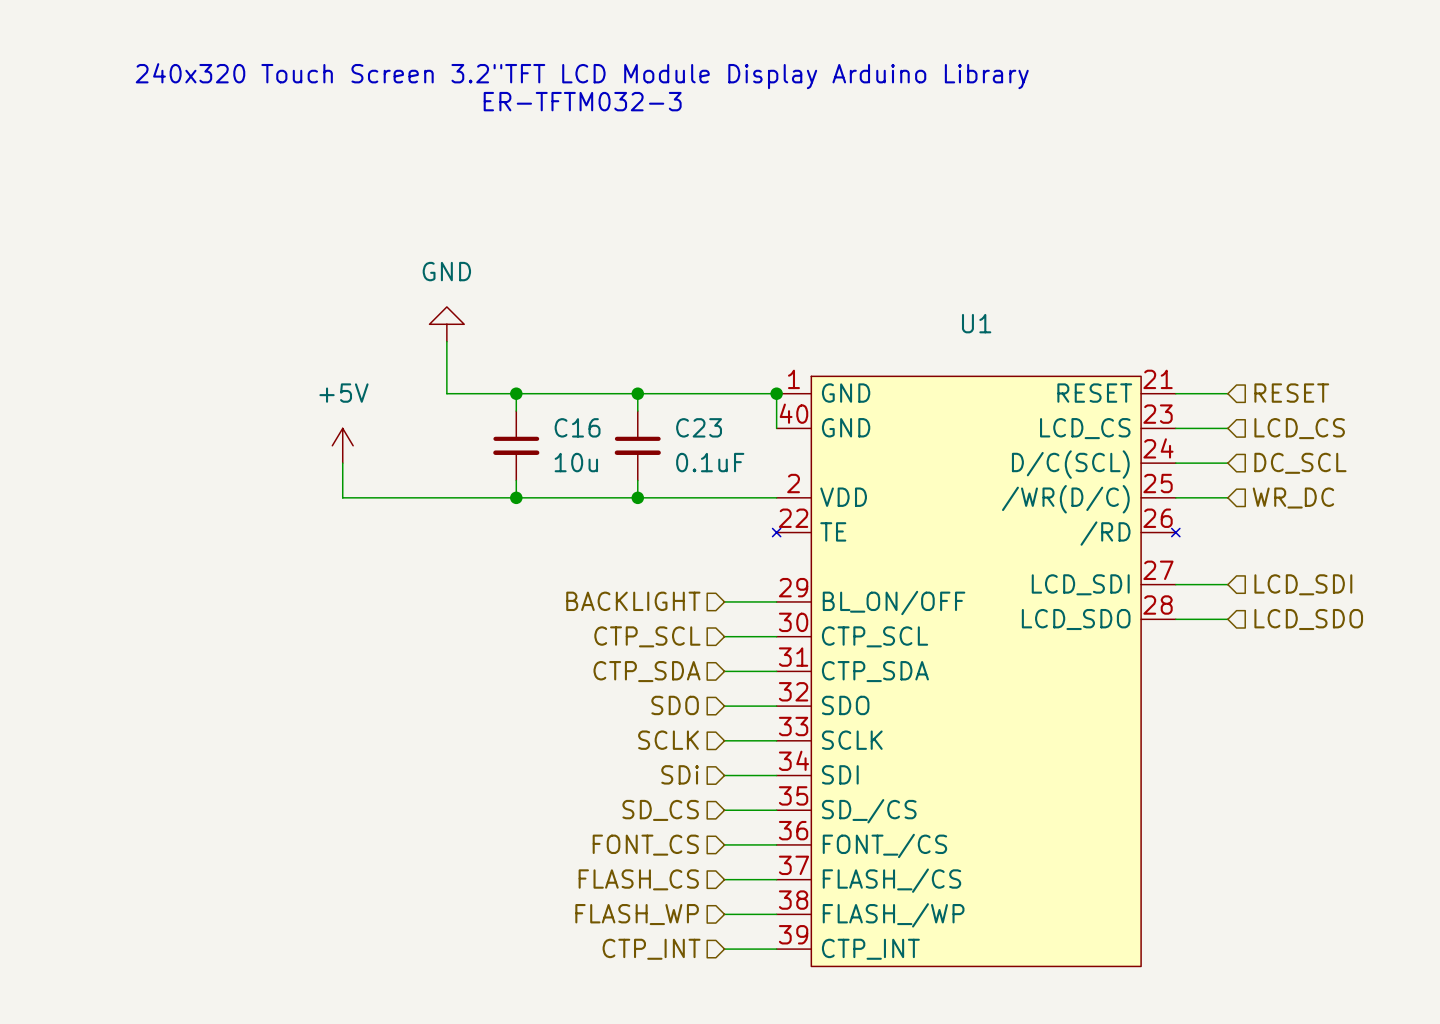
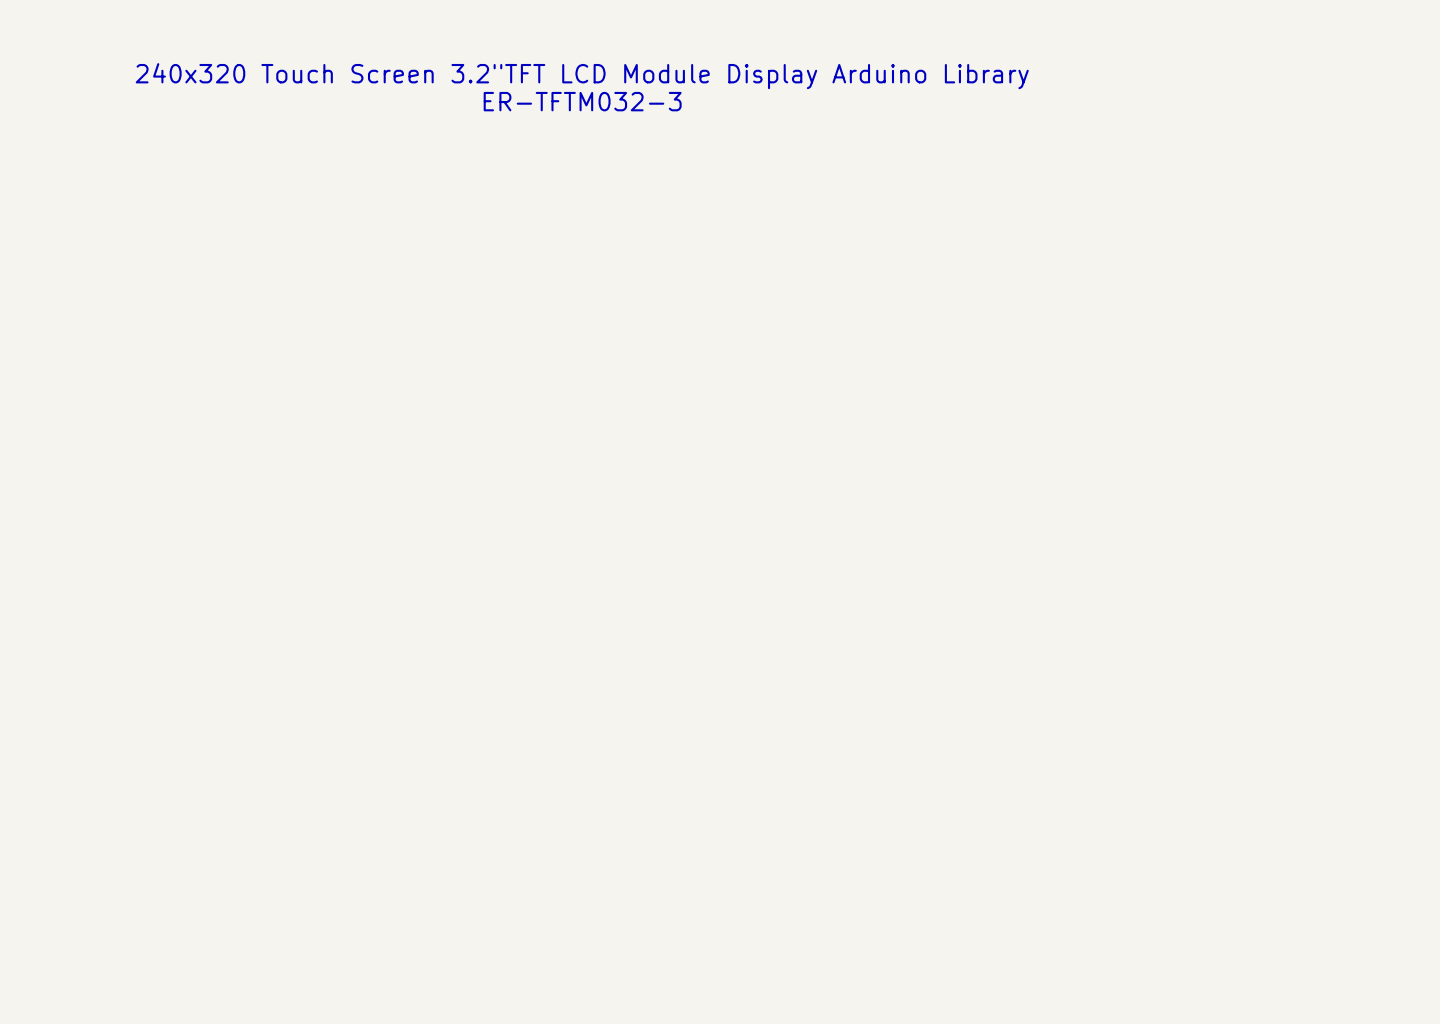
power symbol: GND (446, 324) -> none
wire: (446, 341) (446, 393) (776, 393) (776, 428) -> none
wire: (516, 393) (516, 411) -> none
junction: (516, 393) -> none
wire: (637, 393) (637, 411) -> none
junction: (637, 393) -> none
junction: (776, 393) -> none
wire: (1175, 393) (1227, 393) -> none
hierarchical label: RESET (1291, 393) -> none
wire: (1175, 428) (1227, 428) -> none
hierarchical label: LCD_CS (1299, 428) -> none
power symbol: +5V (342, 445) -> none
C16: 10u (516, 445) -> none
C23: 0.1uF (637, 445) -> none
wire: (342, 463) (342, 497) (776, 497) -> none
wire: (1175, 463) (1227, 463) -> none
hierarchical label: DC_SCL (1300, 463) -> none
wire: (516, 480) (516, 497) -> none
wire: (637, 480) (637, 497) -> none
junction: (516, 497) -> none
junction: (637, 497) -> none
wire: (1175, 497) (1227, 497) -> none
hierarchical label: WR_DC (1293, 498) -> none
wire: (1175, 584) (1227, 584) -> none
hierarchical label: LCD_SDI (1303, 584) -> none
hierarchical label: BACKLIGHT (633, 601) -> none
wire: (724, 601) (776, 601) -> none
wire: (1175, 619) (1227, 619) -> none
hierarchical label: LCD_SDO (1308, 619) -> none
hierarchical label: CTP_SCL (647, 636) -> none
wire: (724, 636) (776, 636) -> none
hierarchical label: CTP_SDA (647, 671) -> none
wire: (724, 671) (776, 671) -> none
U1: (976, 671) -> none
hierarchical label: SDO (675, 705) -> none
wire: (724, 706) (776, 706) -> none
hierarchical label: SCLK (668, 740) -> none
wire: (724, 740) (776, 740) -> none
hierarchical label: SDi (680, 774) -> none
wire: (724, 775) (776, 775) -> none
hierarchical label: SD_CS (660, 810) -> none
wire: (724, 810) (776, 810) -> none
wire: (724, 844) (776, 844) -> none
hierarchical label: FONT_CS (645, 845) -> none
hierarchical label: FLASH_CS (638, 879) -> none
wire: (724, 879) (776, 879) -> none
hierarchical label: FLASH_WP (637, 914) -> none
wire: (724, 914) (776, 914) -> none
hierarchical label: CTP_INT (651, 949) -> none
wire: (724, 949) (776, 949) -> none

